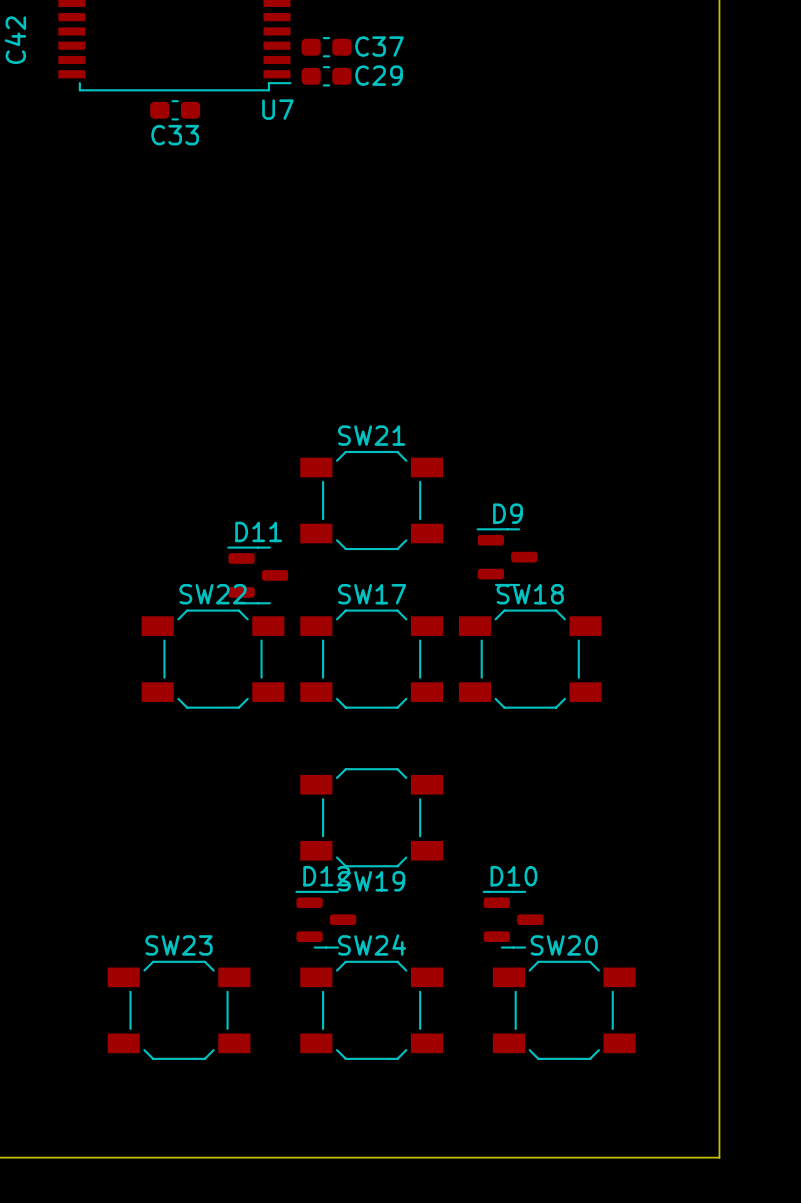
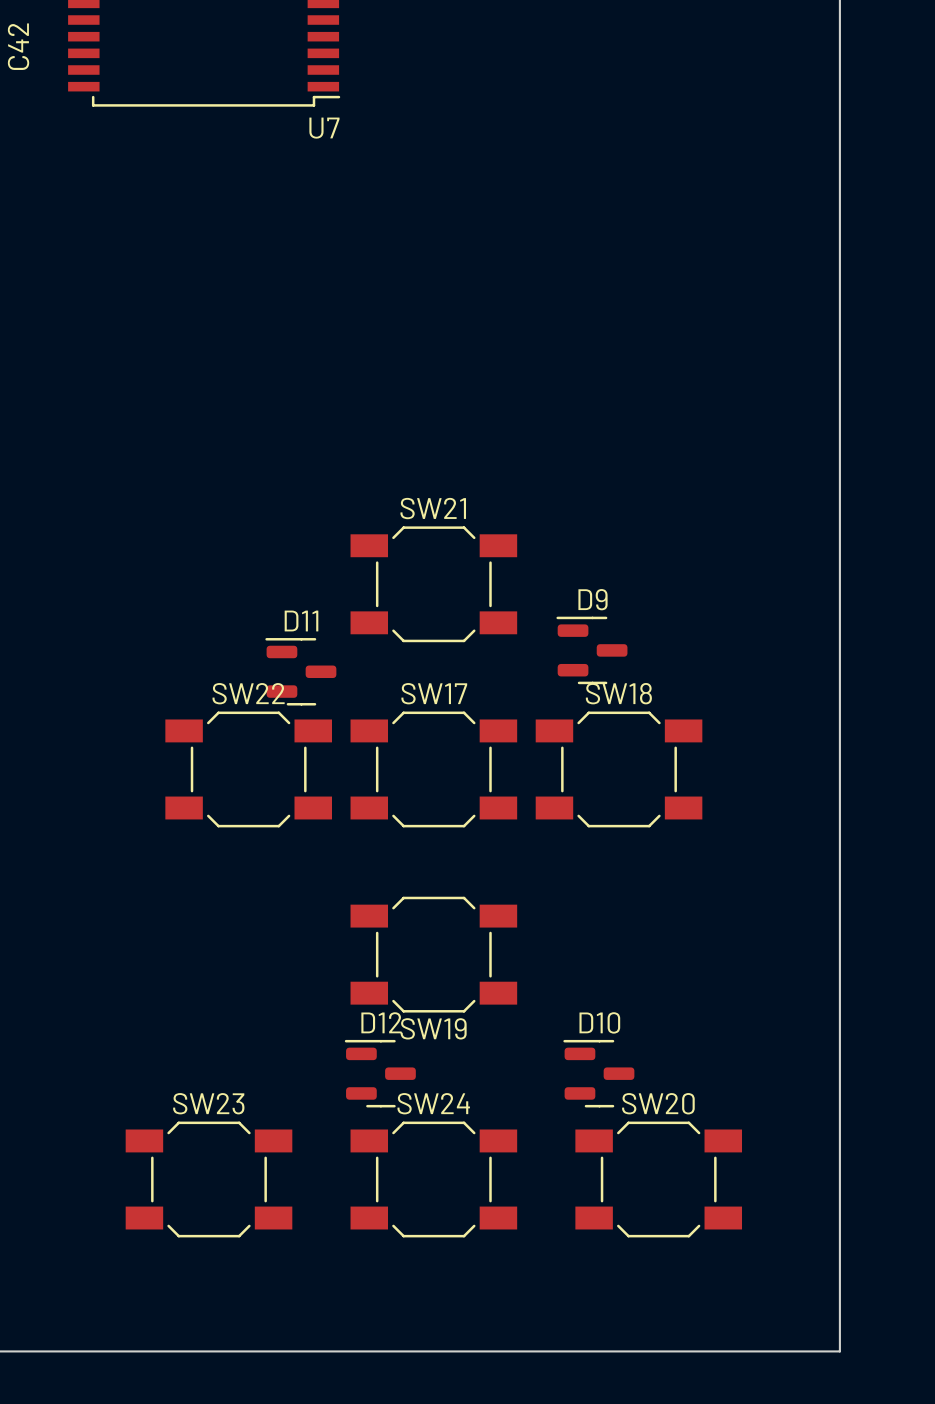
C37: (326, 47) -> none
C29: (326, 76) -> none
C33: (175, 110) -> none

